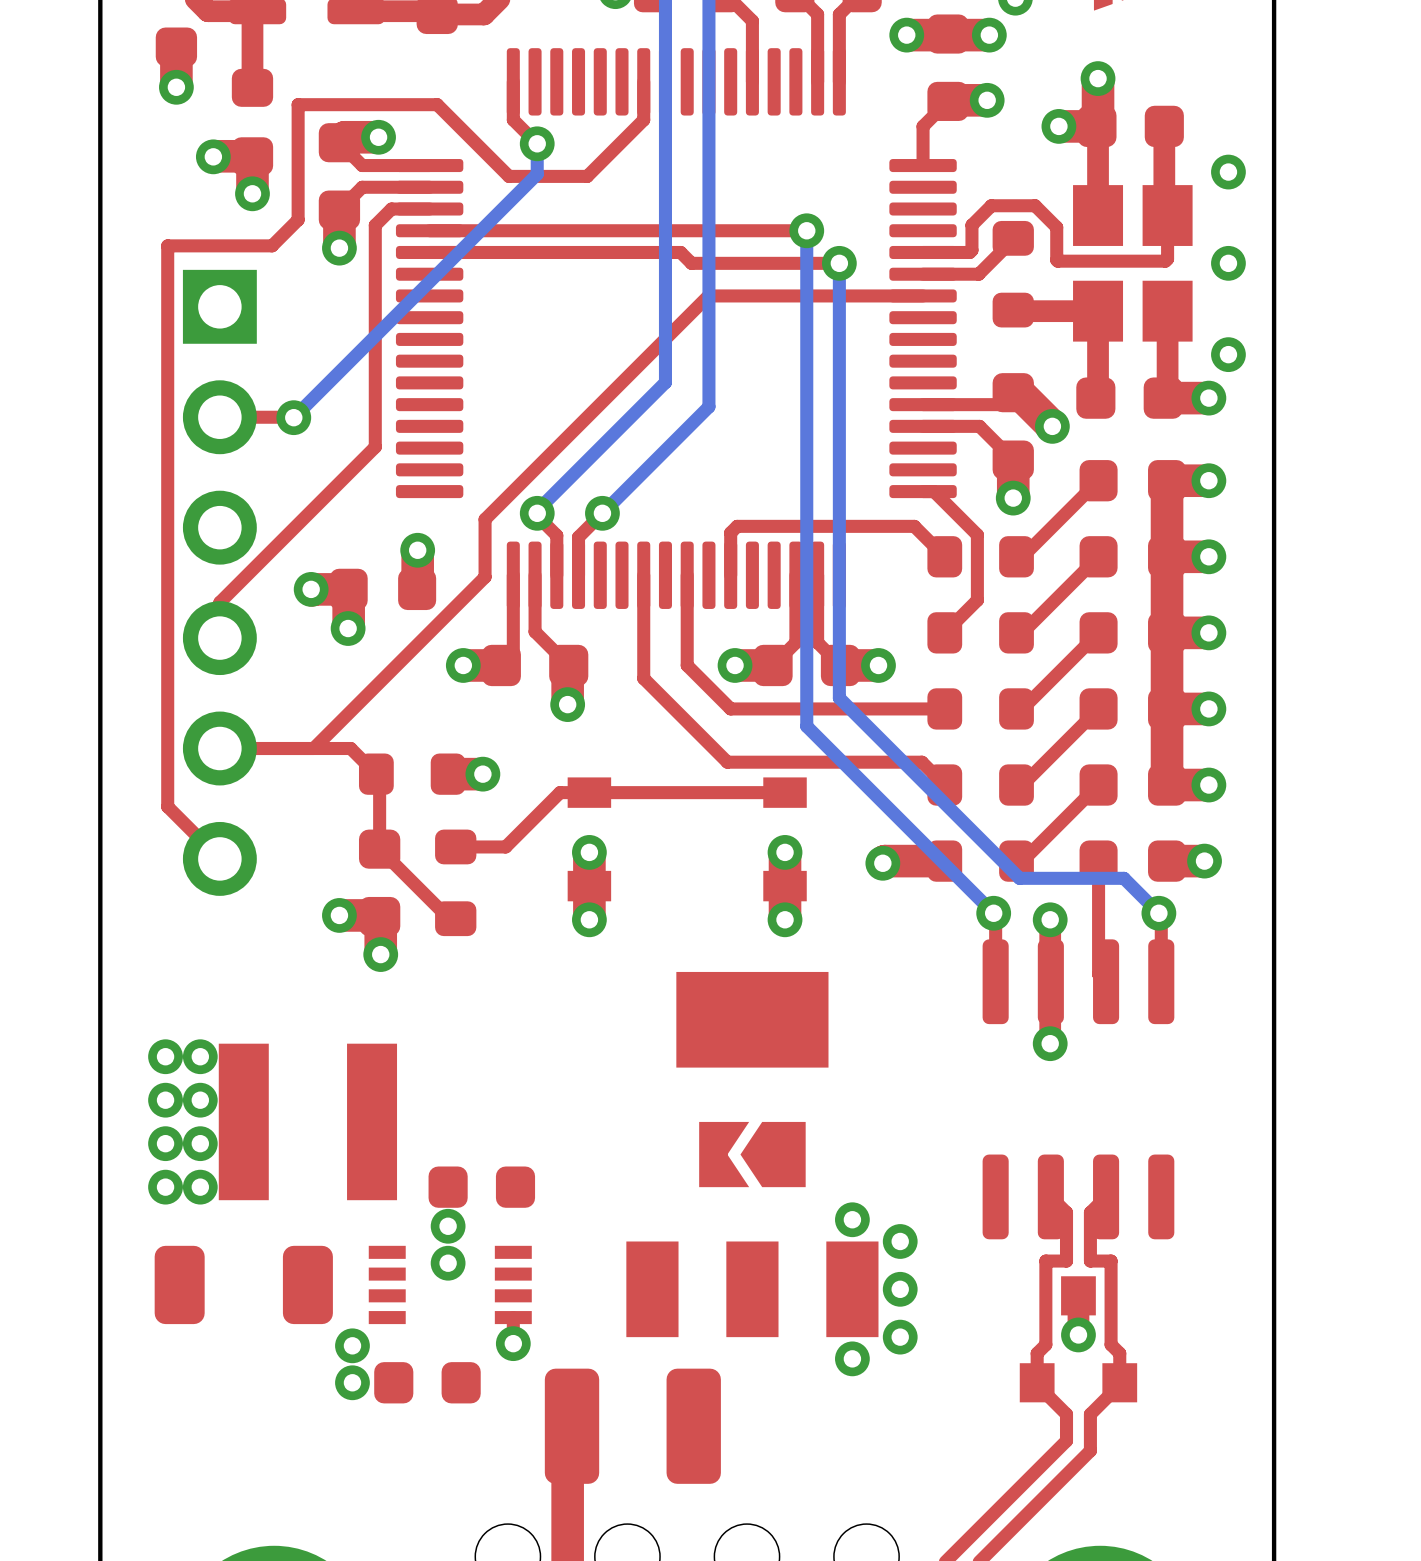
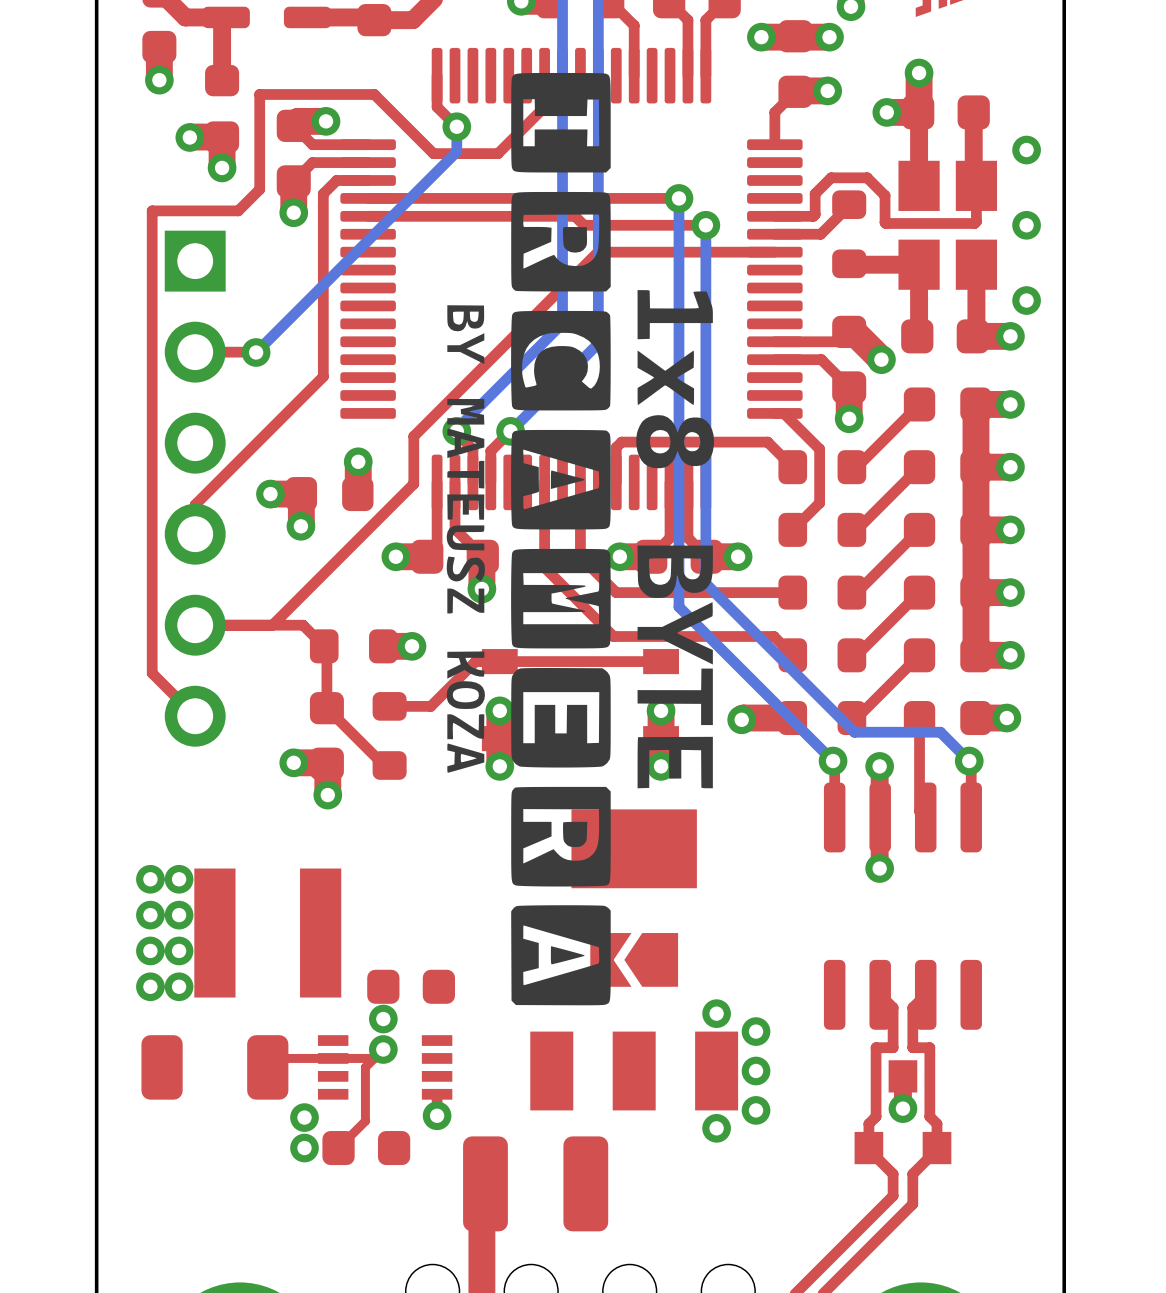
drawing: none -> [446, 72, 715, 1006]
top track: none -> (383, 1049) (365, 1067) (365, 1121) (338, 1148)
top track: none -> (374, 1058) (276, 1058) (267, 1067)

